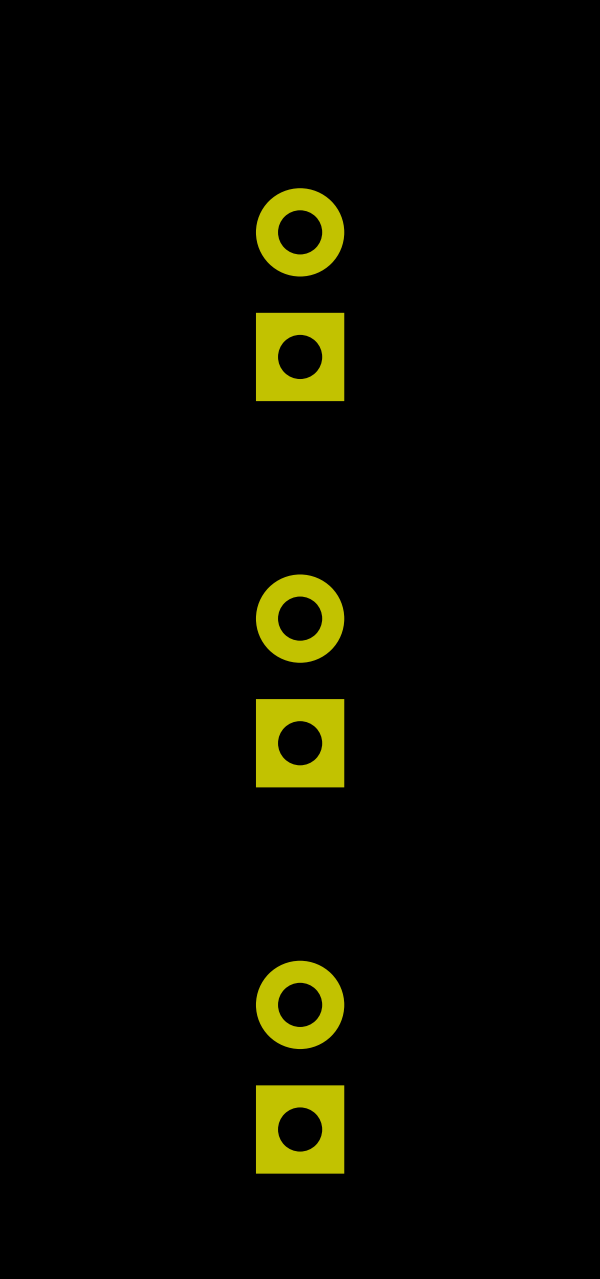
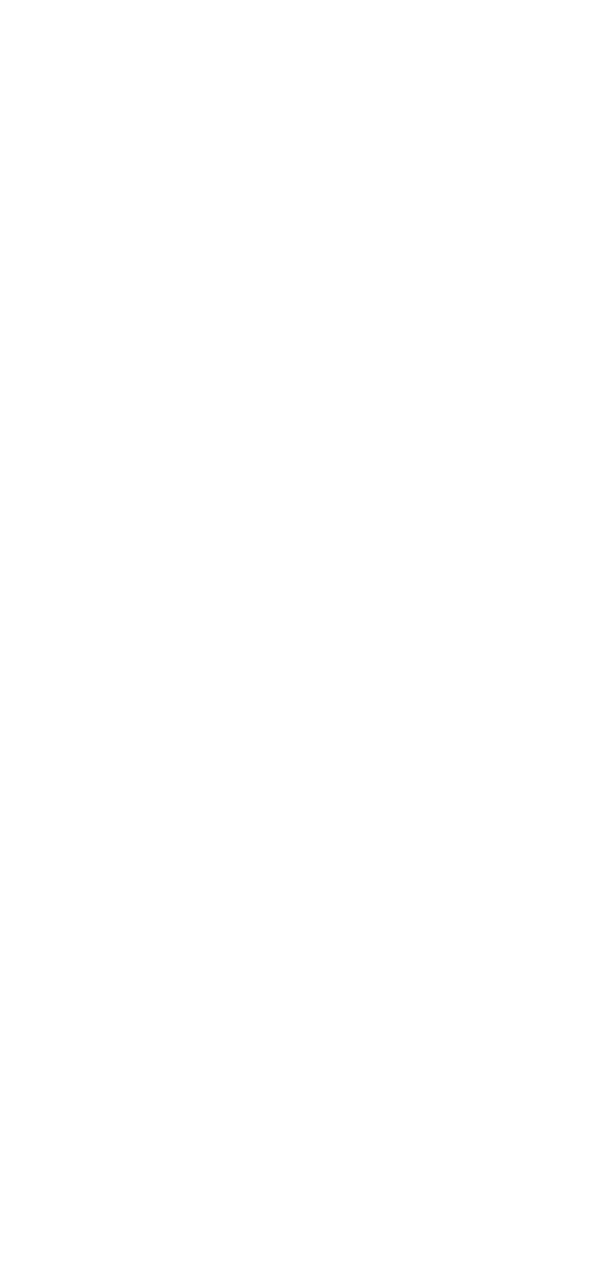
part: (300, 294) -> none
part: (300, 680) -> none
part: (300, 1067) -> none

